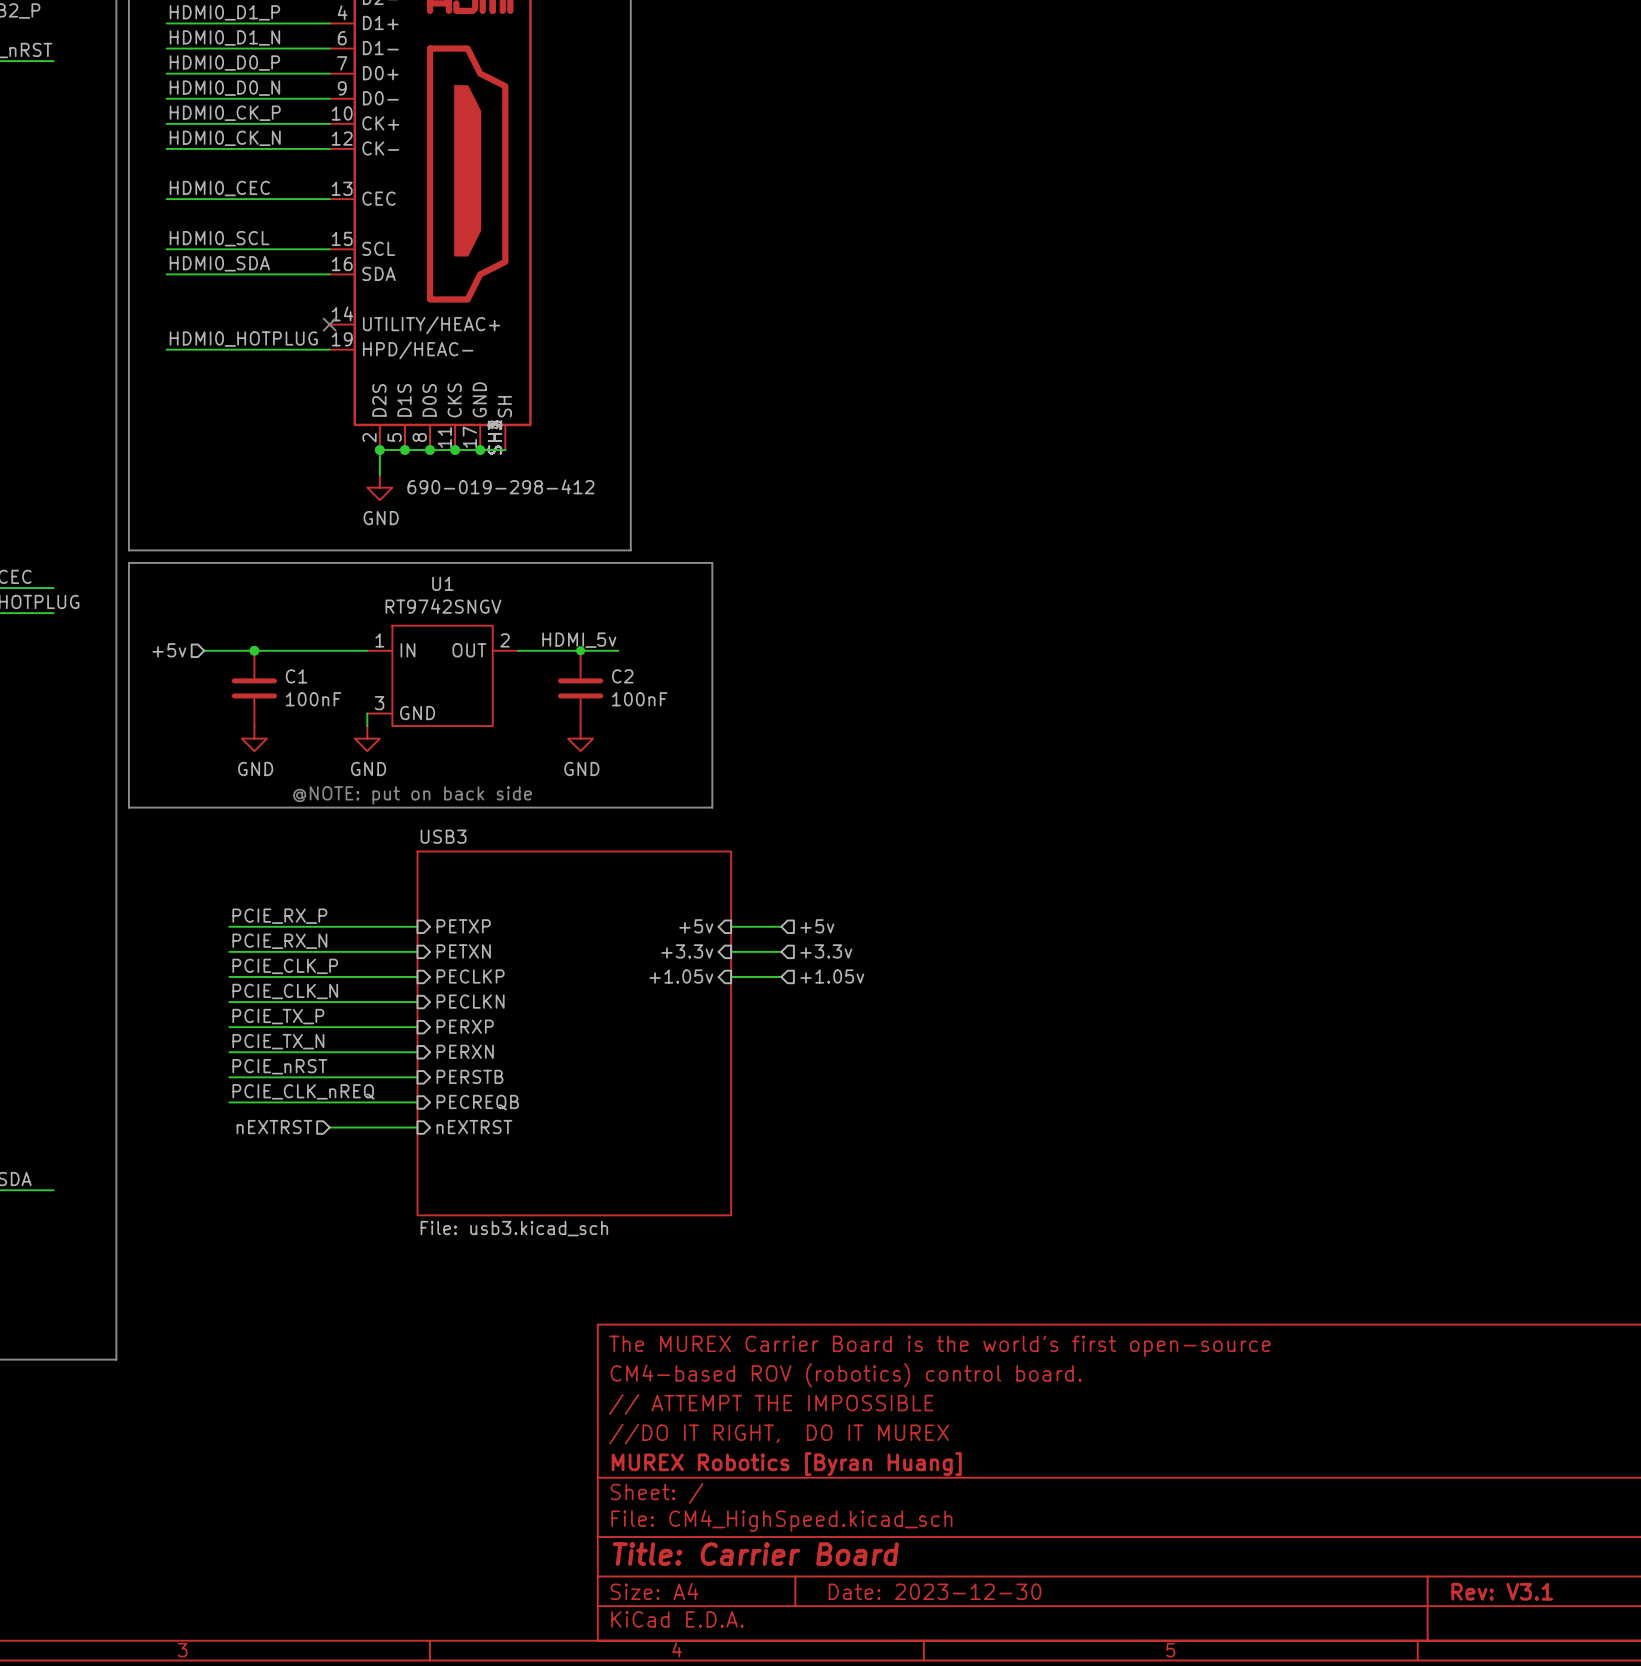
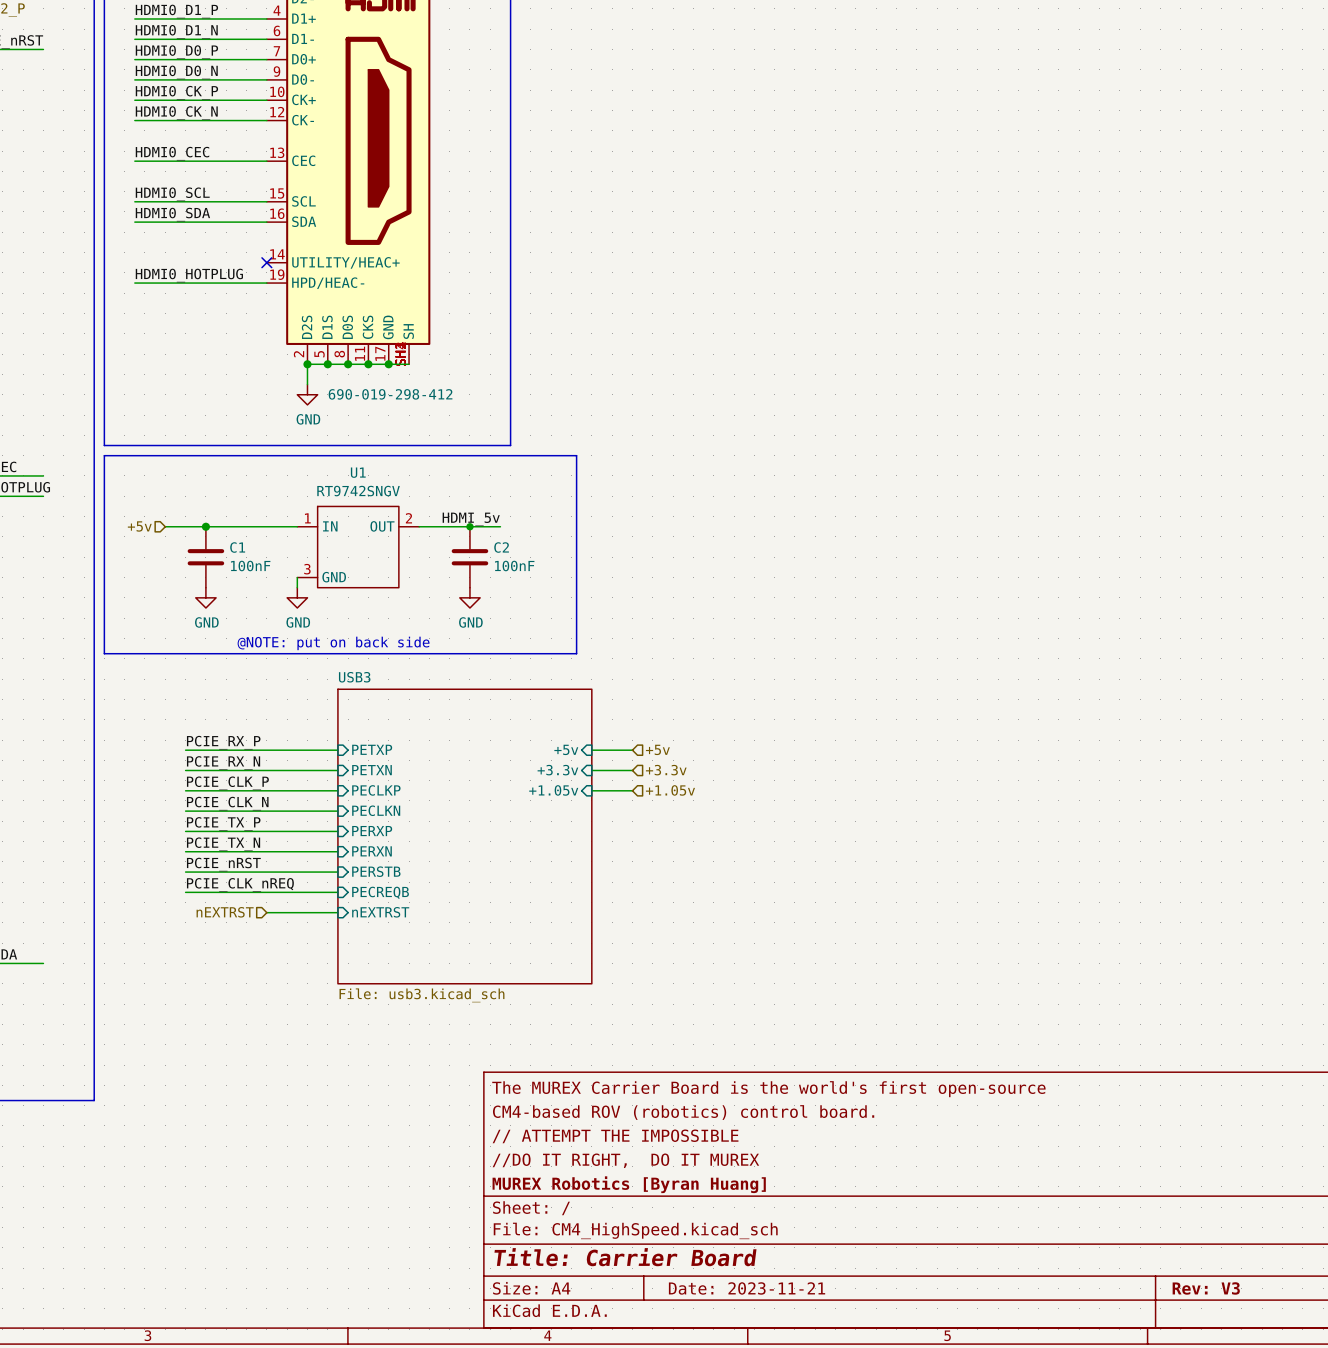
title block: Date: 2023-12-30 (935, 1591) -> Date: 2023-11-21 (747, 1288)
title block: Rev: V3.1 (1502, 1591) -> Rev: V3 (1206, 1288)

